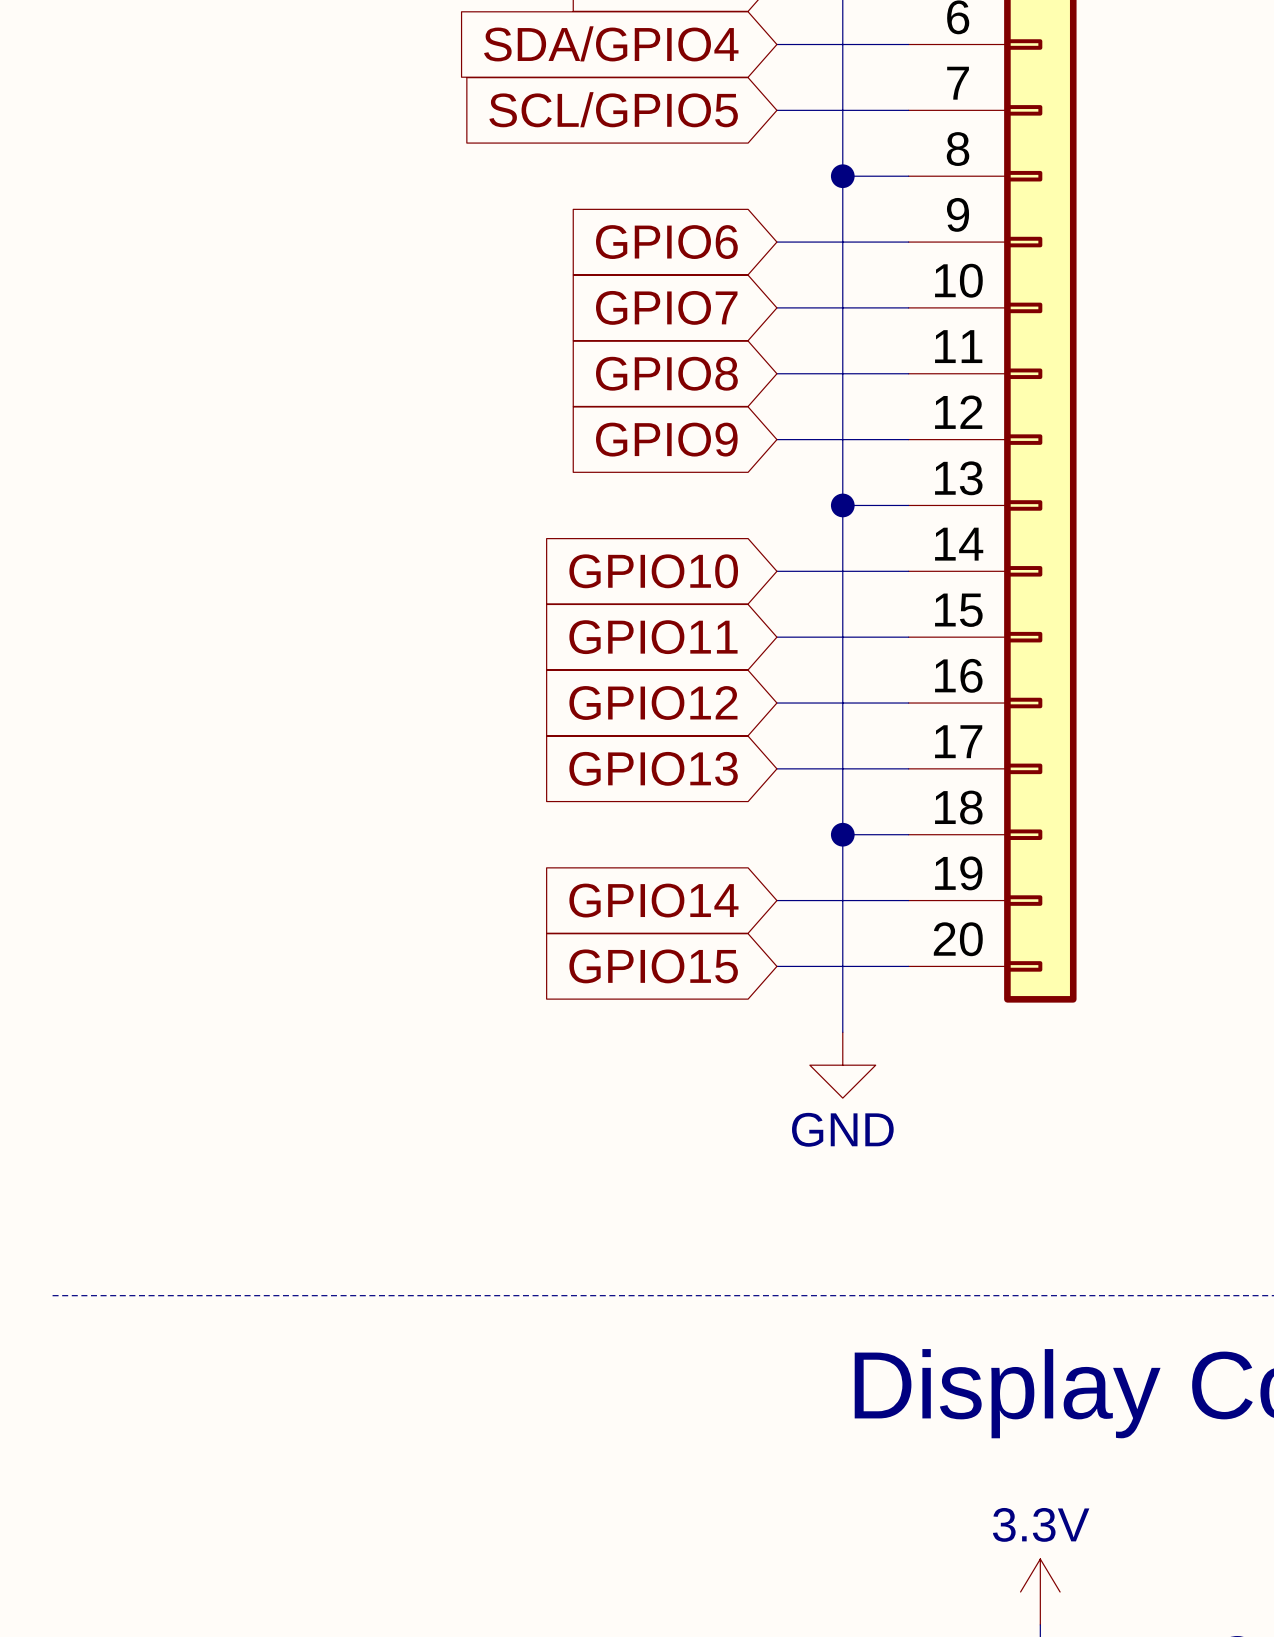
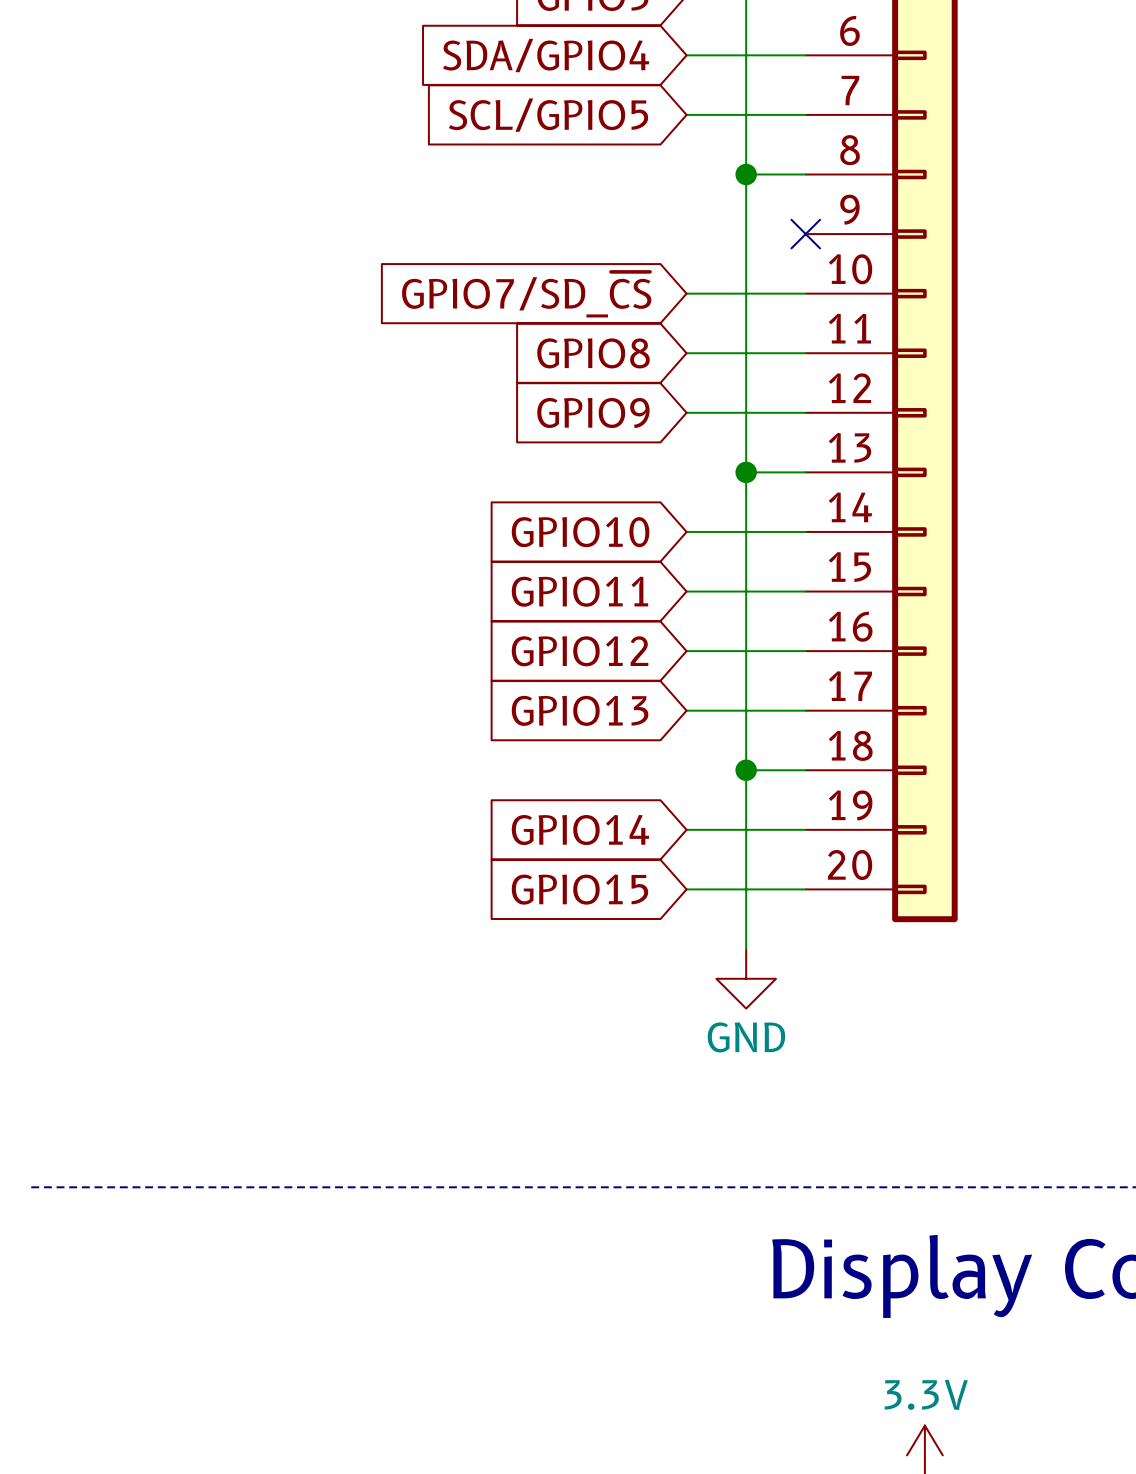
global label: GPIO6 (666, 242) -> none
wire: (776, 242) (908, 242) -> none
no-connect mark: none -> (805, 234)
global label: GPIO7 (666, 307) -> GPIO7/SD_~{CS} (526, 294)

